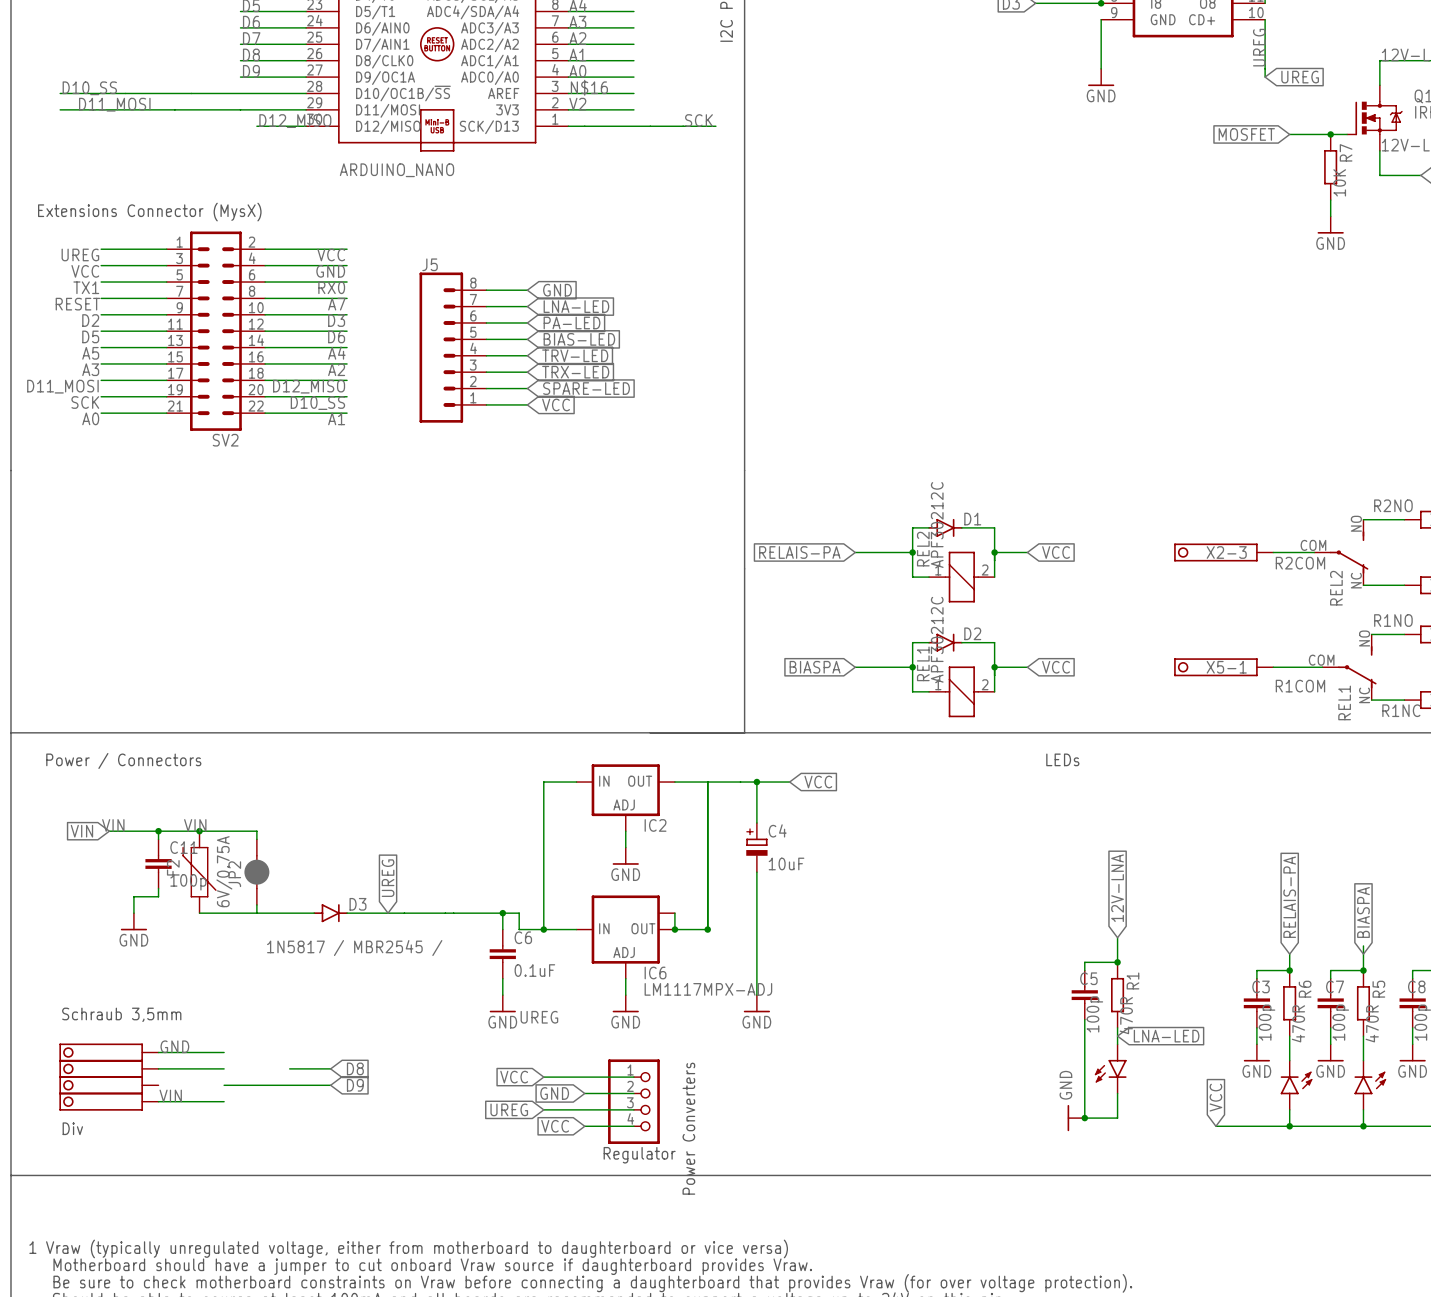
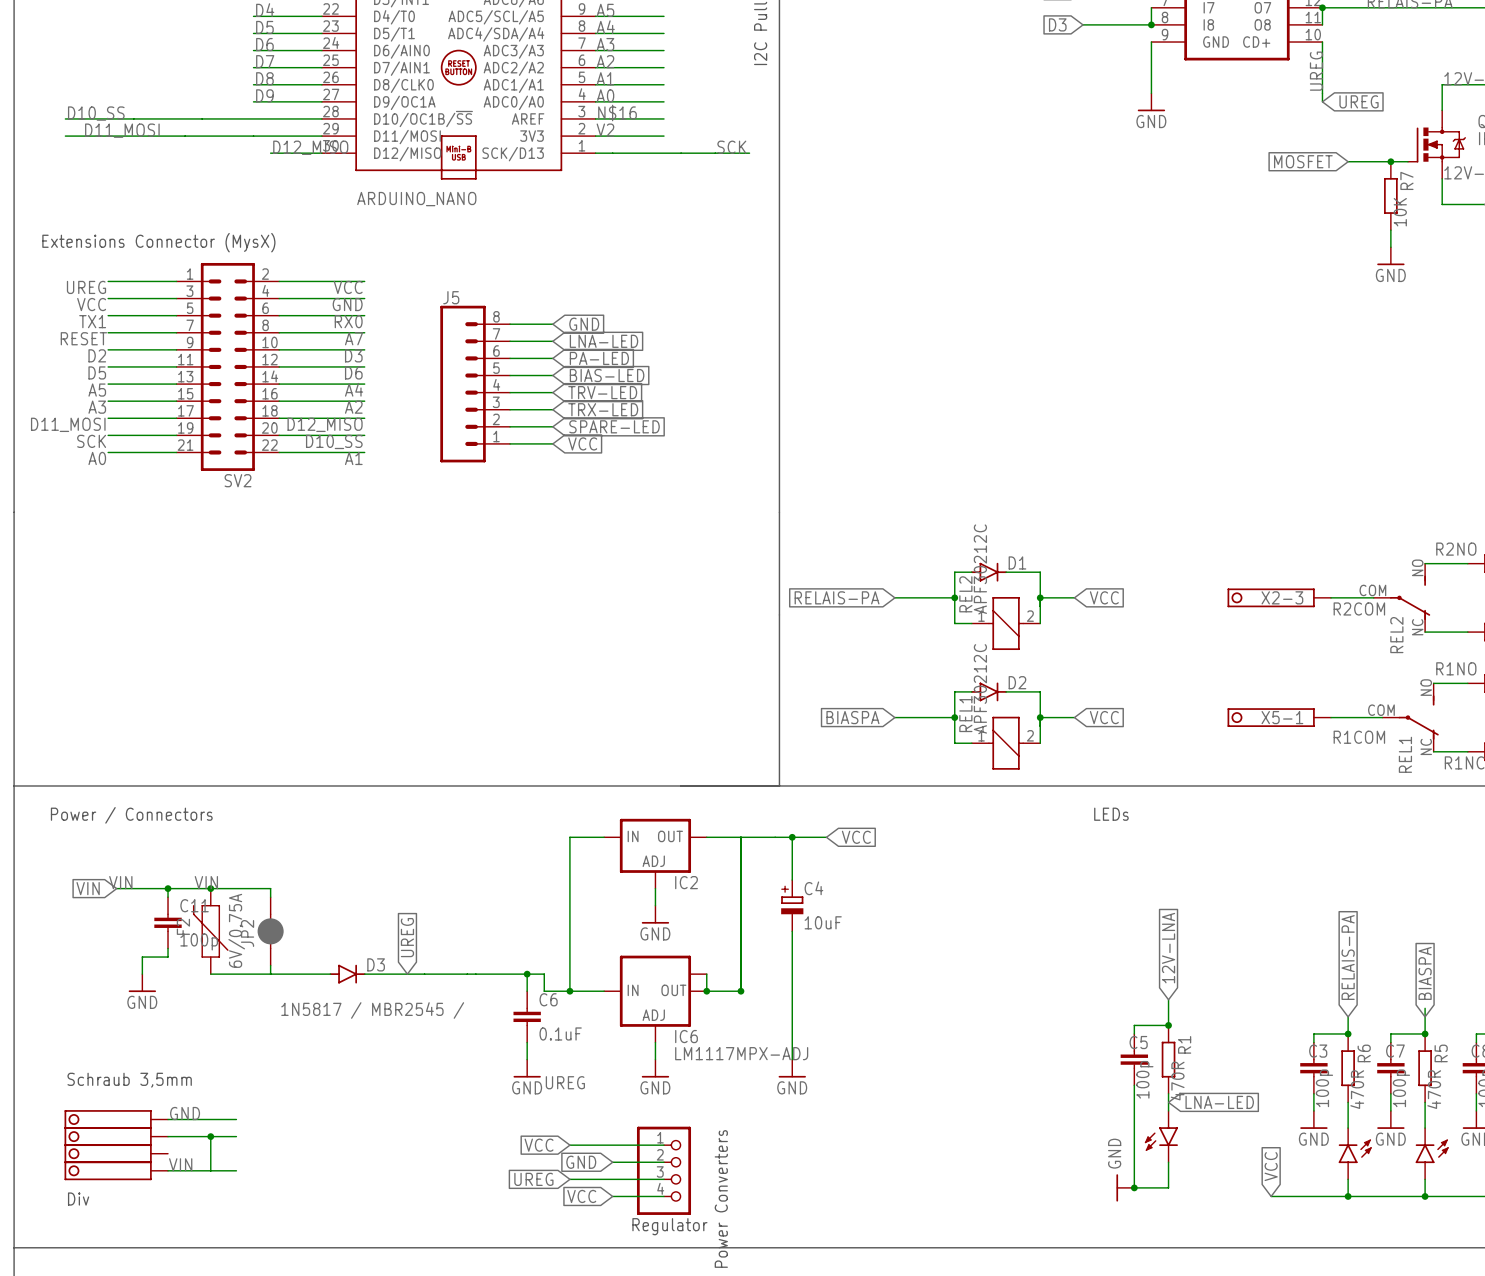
wire: none -> (210, 1136) (210, 1170)
junction: none -> (210, 1136)
wire: (289, 1068) (330, 1068) -> none
global label: D8 (355, 1068) -> none
wire: (224, 1085) (330, 1085) -> none
global label: D9 (355, 1085) -> none

